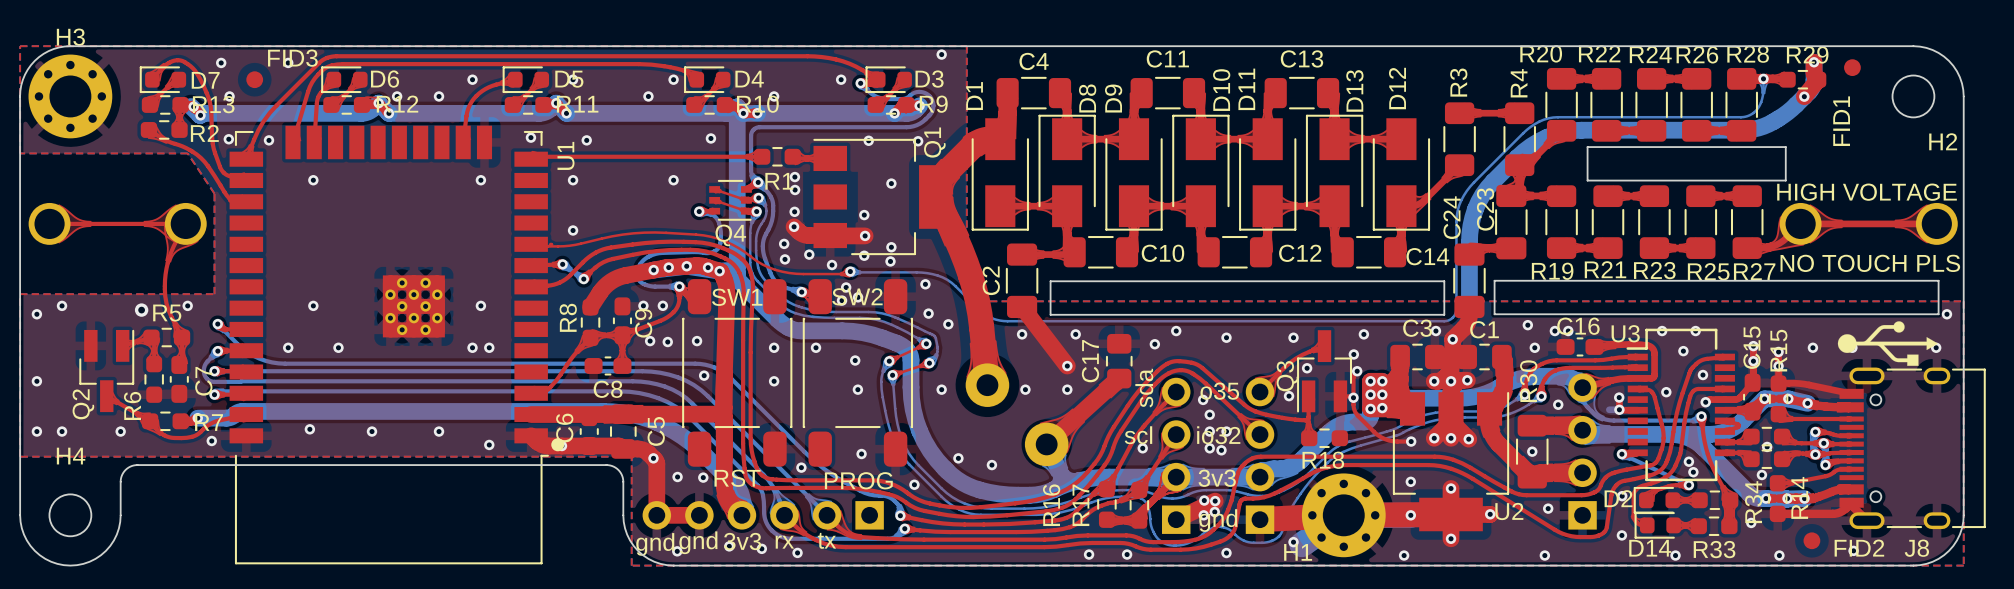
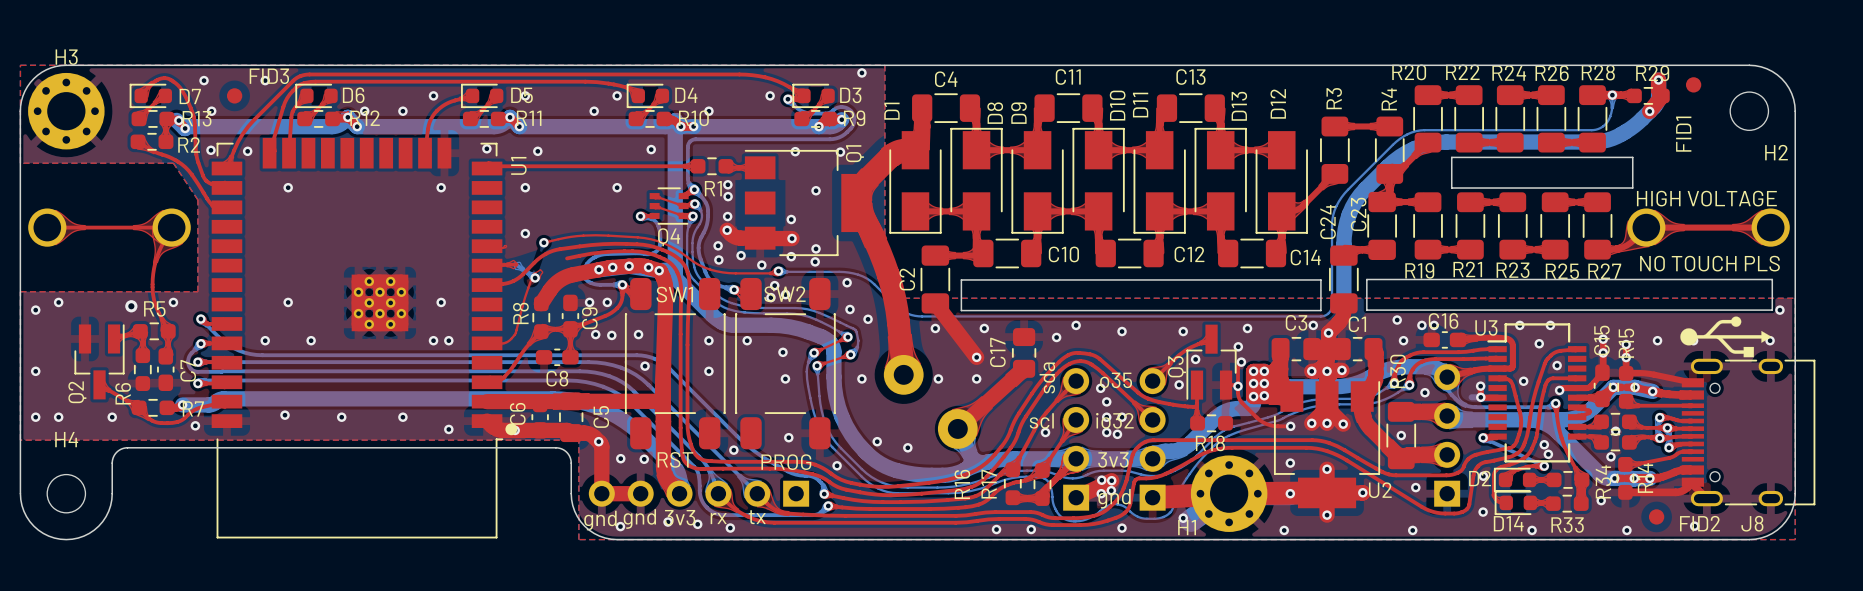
top track: (666, 232) (622, 234) (563, 246) (531, 244) -> (610, 235) (577, 236) (543, 242)
top track: (618, 257) (599, 264) (583, 279) -> none
via position: (562, 264) -> (543, 242)
top track: none -> (531, 279) (515, 334) (505, 342) (487, 343)

